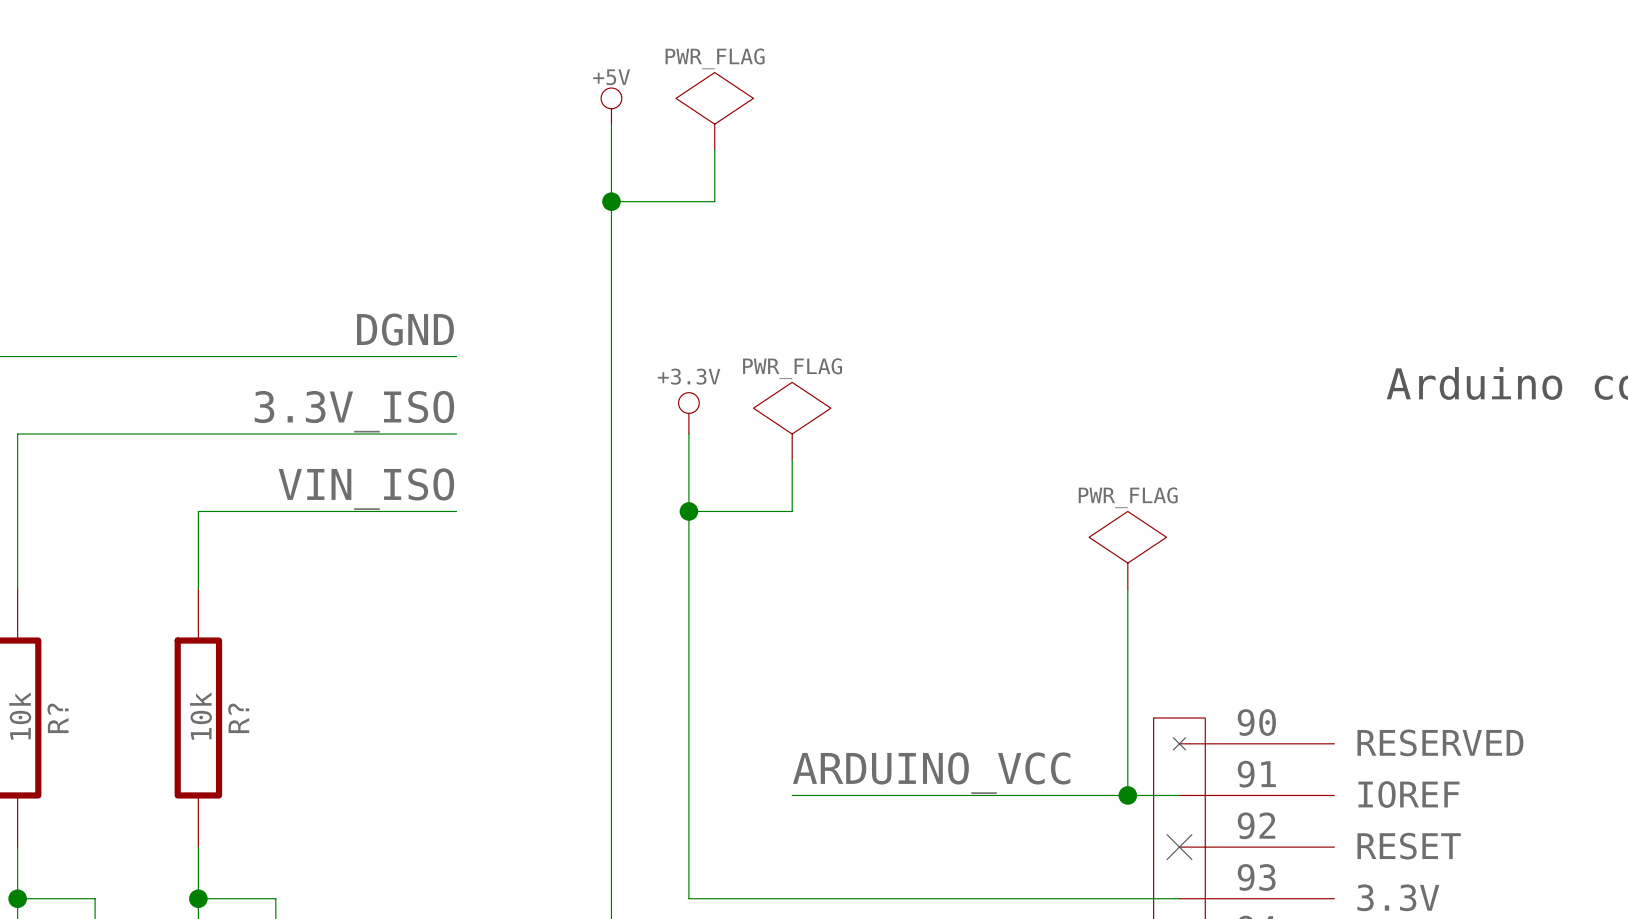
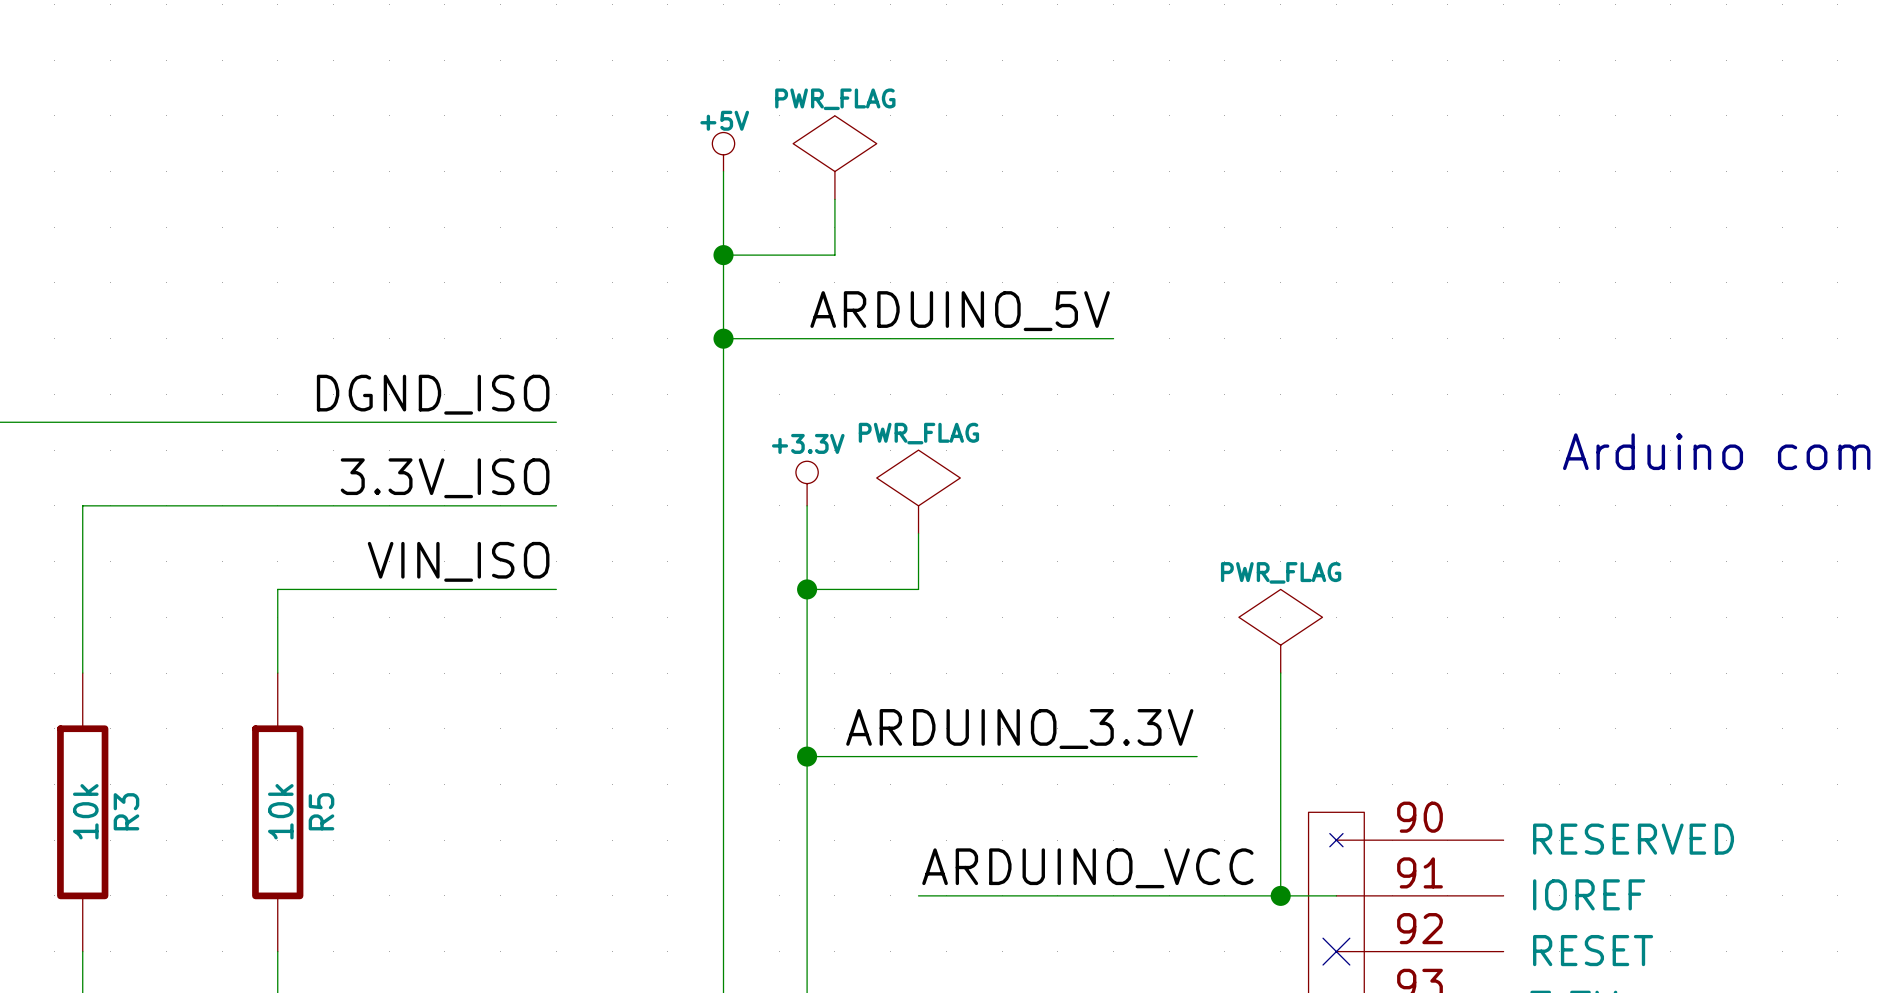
label: none -> ARDUINO_5V (960, 311)
wire: none -> (723, 338) (1113, 338)
junction: none -> (723, 338)
label: DGND (405, 329) -> DGND_ISO (433, 394)
label: none -> ARDUINO_3.3V (1019, 729)
wire: none -> (807, 756) (1197, 756)
junction: none -> (807, 756)
R? name: R? (57, 718) -> R3 (126, 811)
R? name: R? (238, 718) -> R5 (321, 811)

